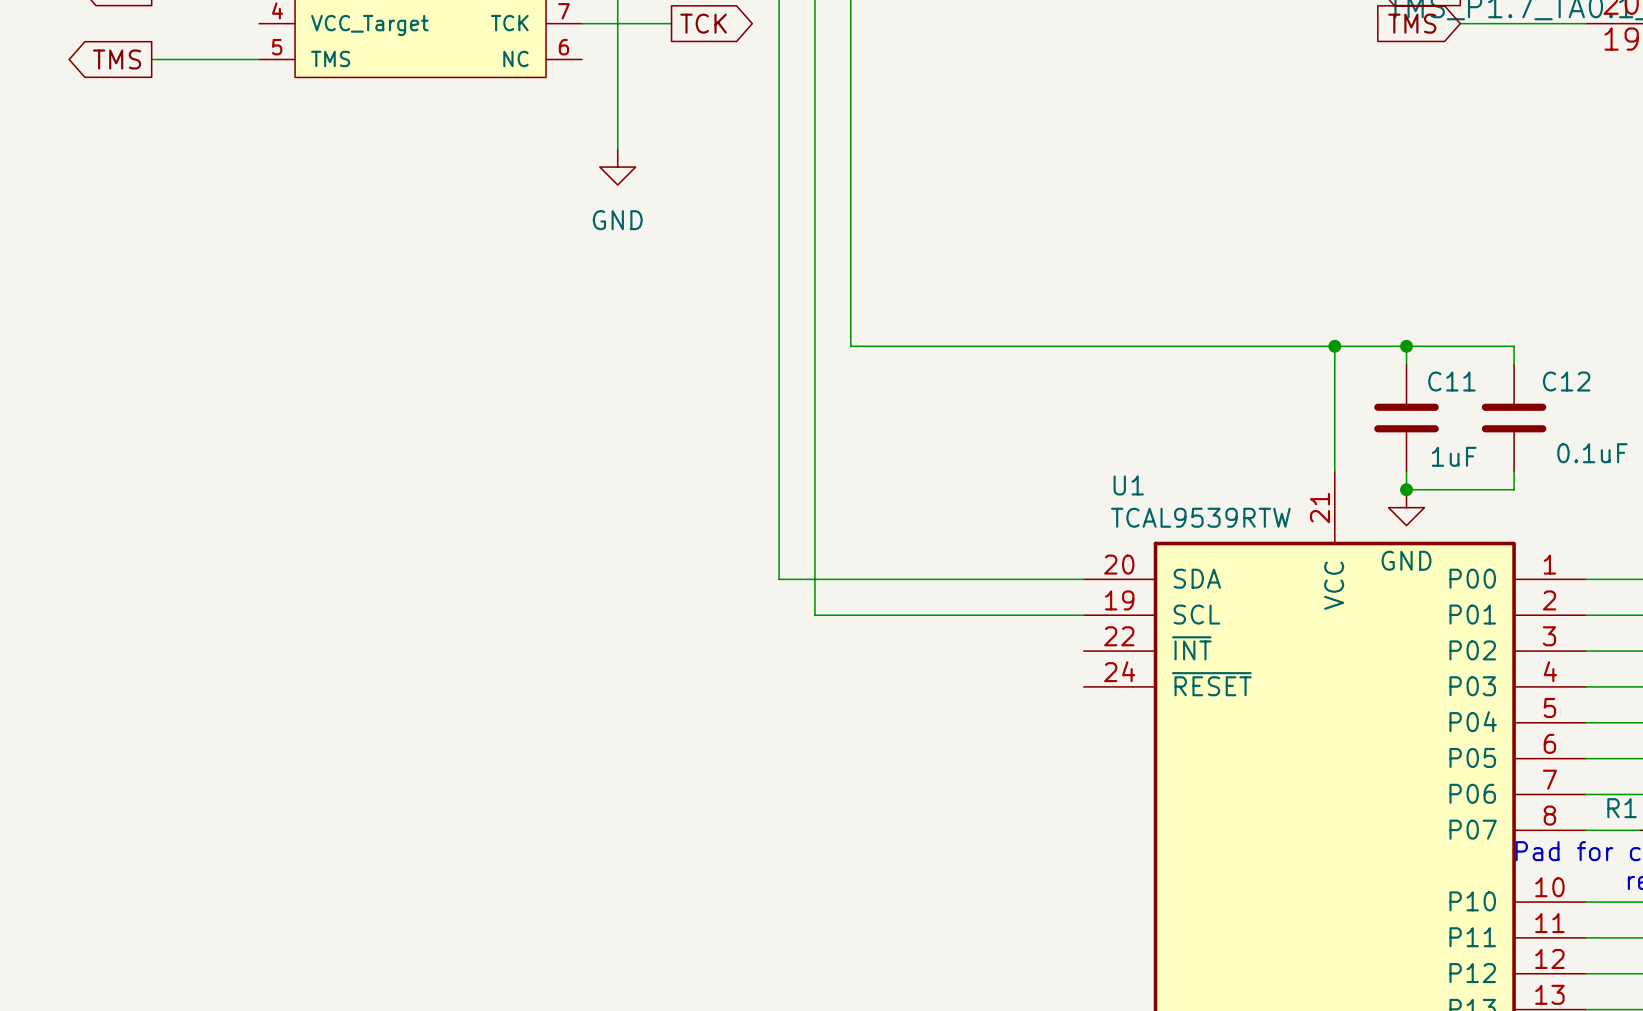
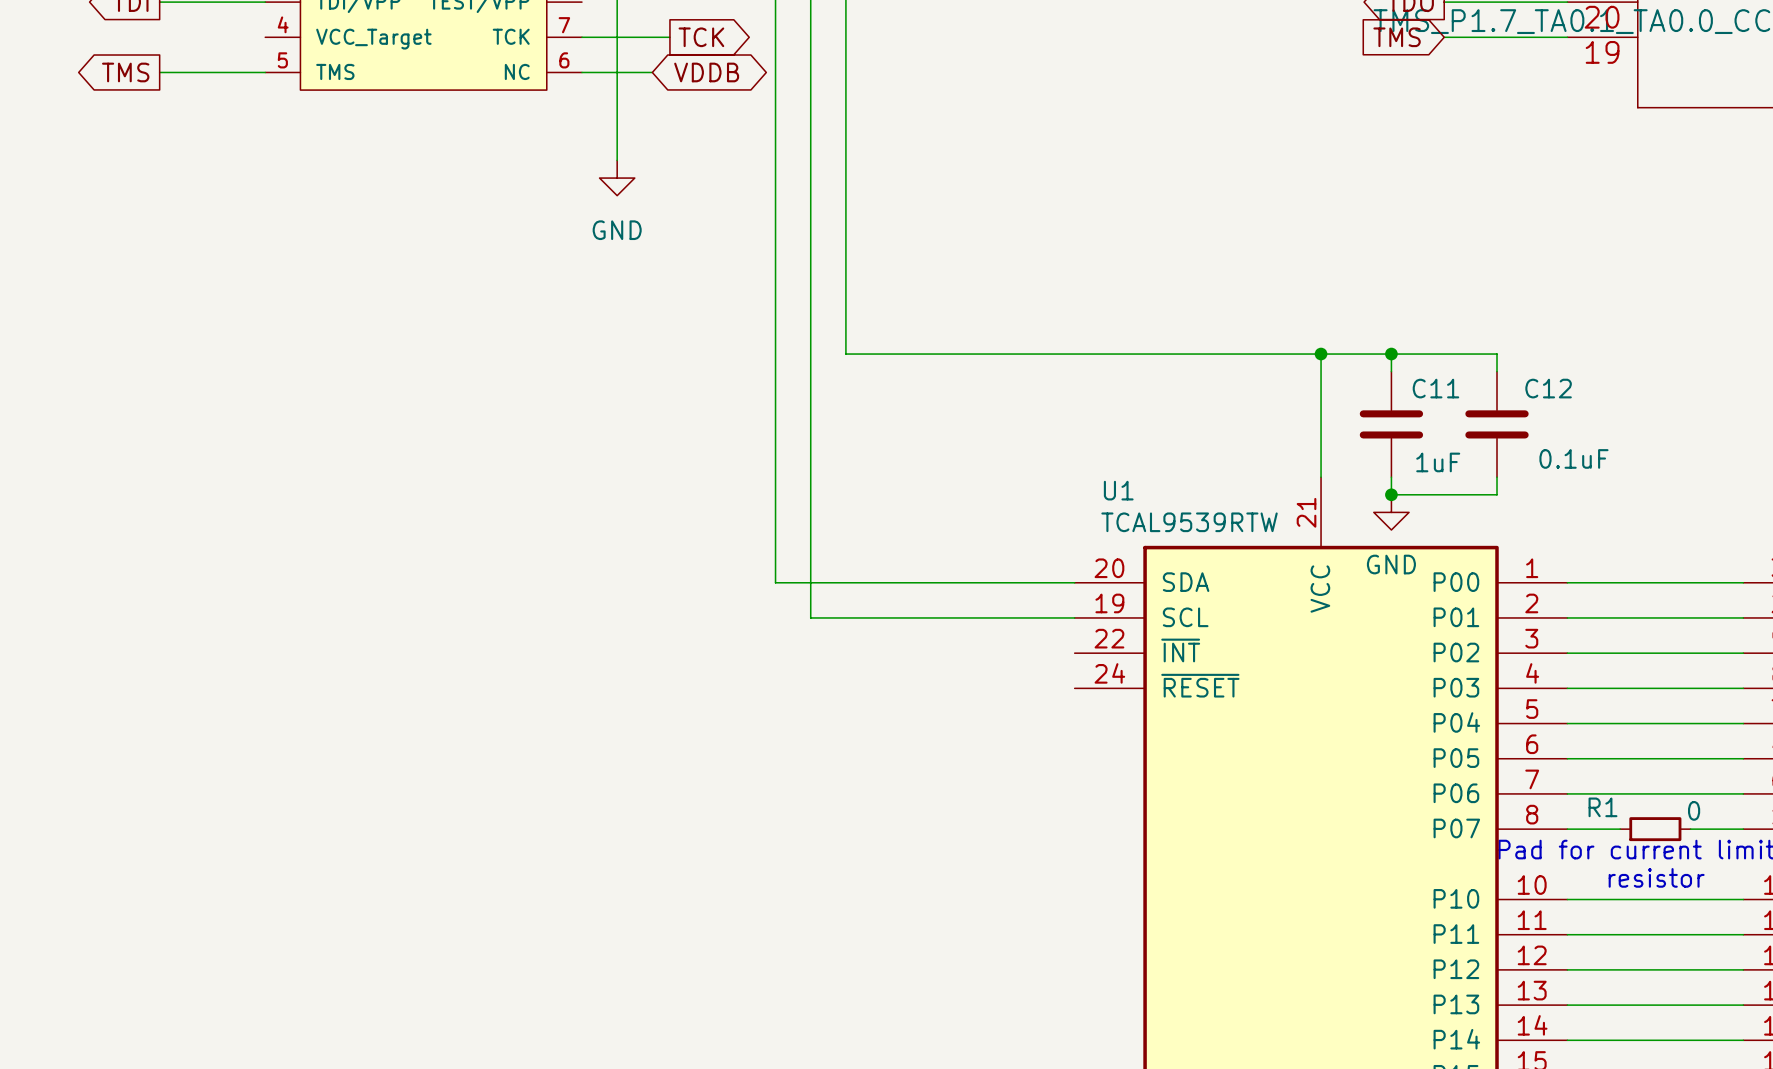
wire: none -> (581, 72) (652, 72)
global label: none -> VDDB (706, 72)

